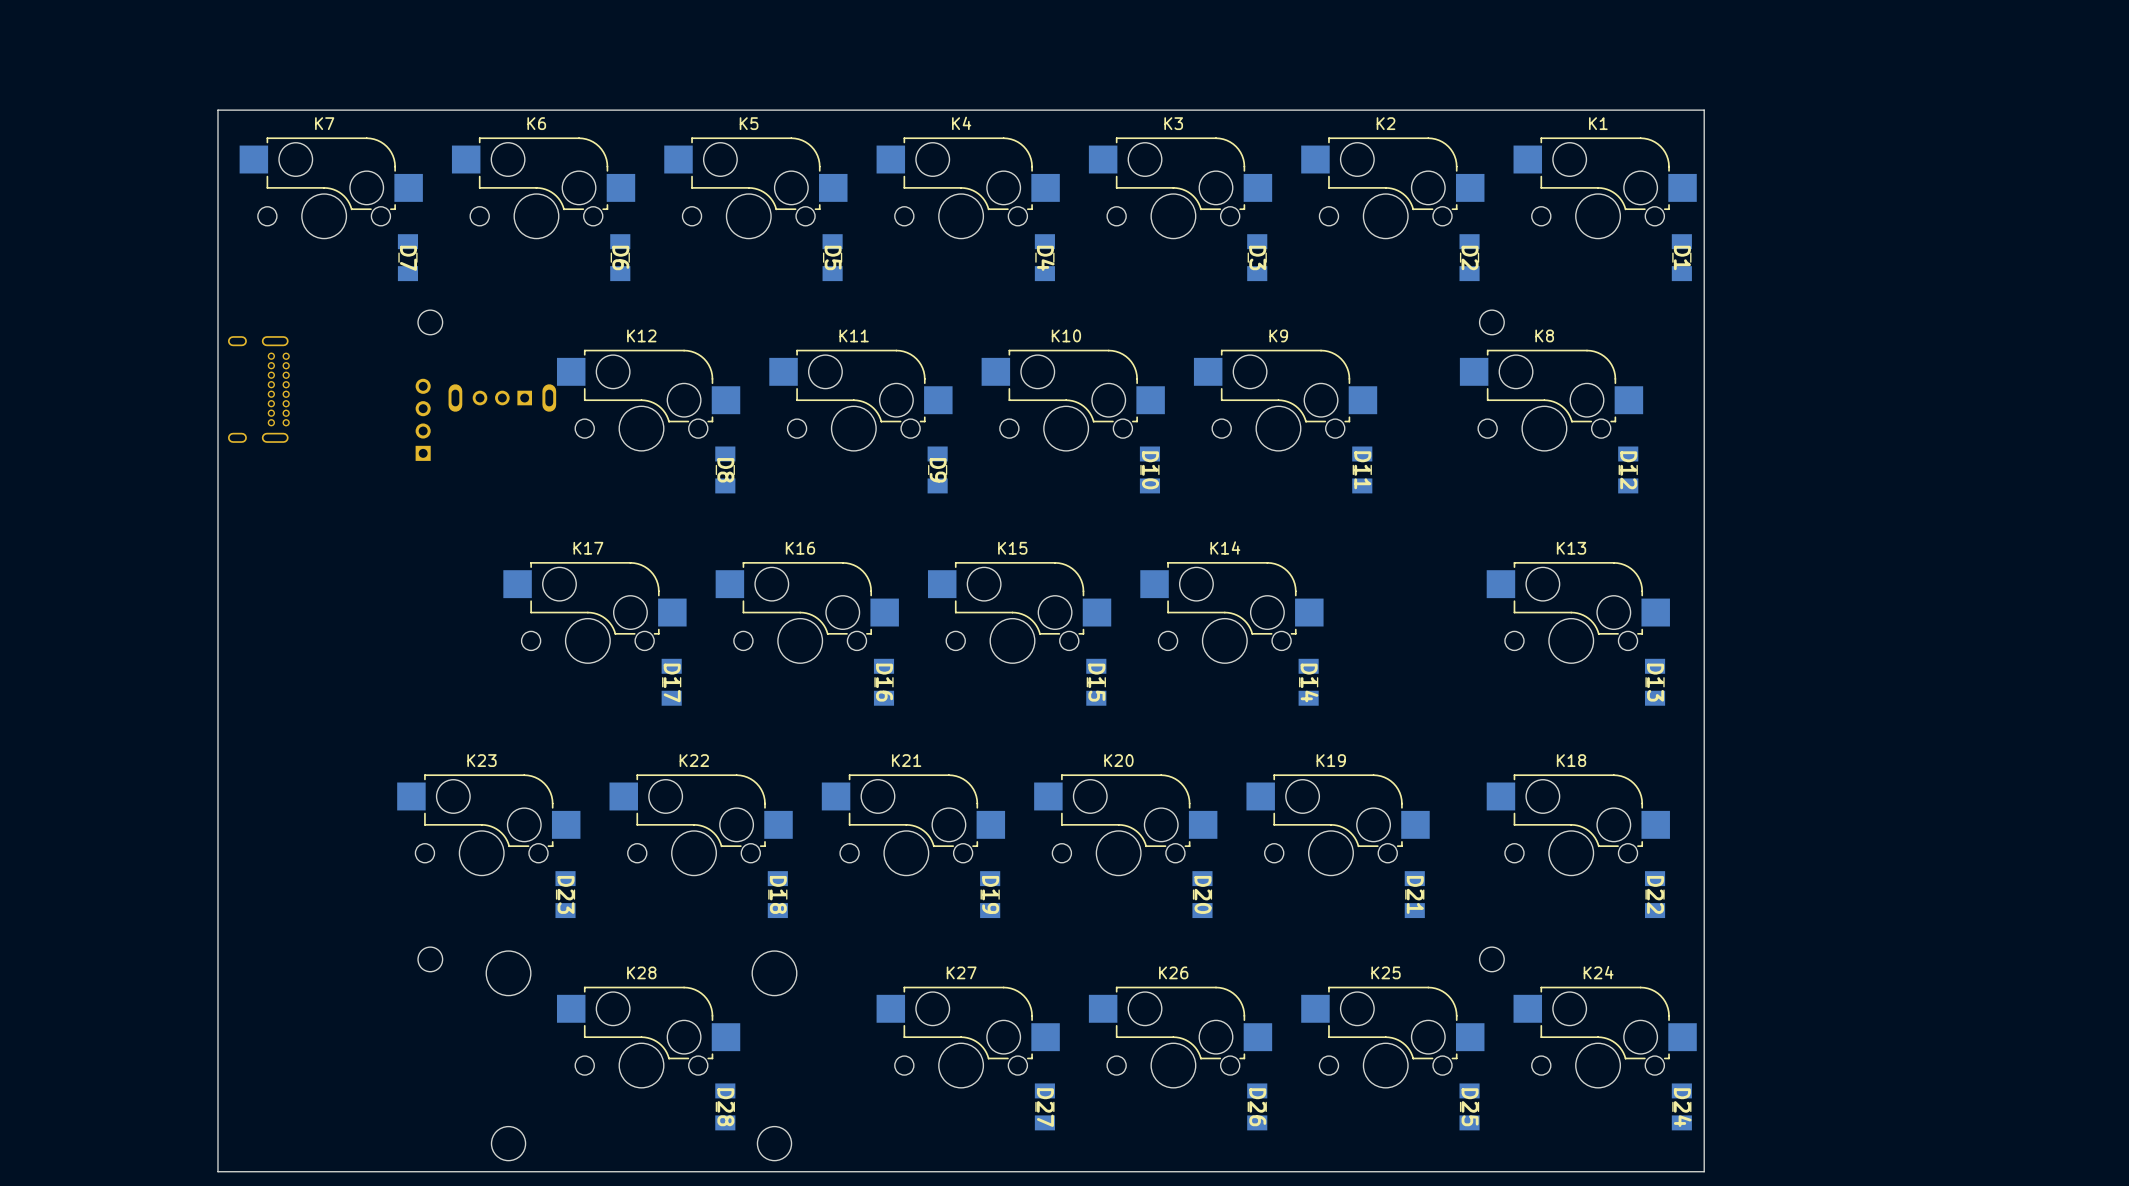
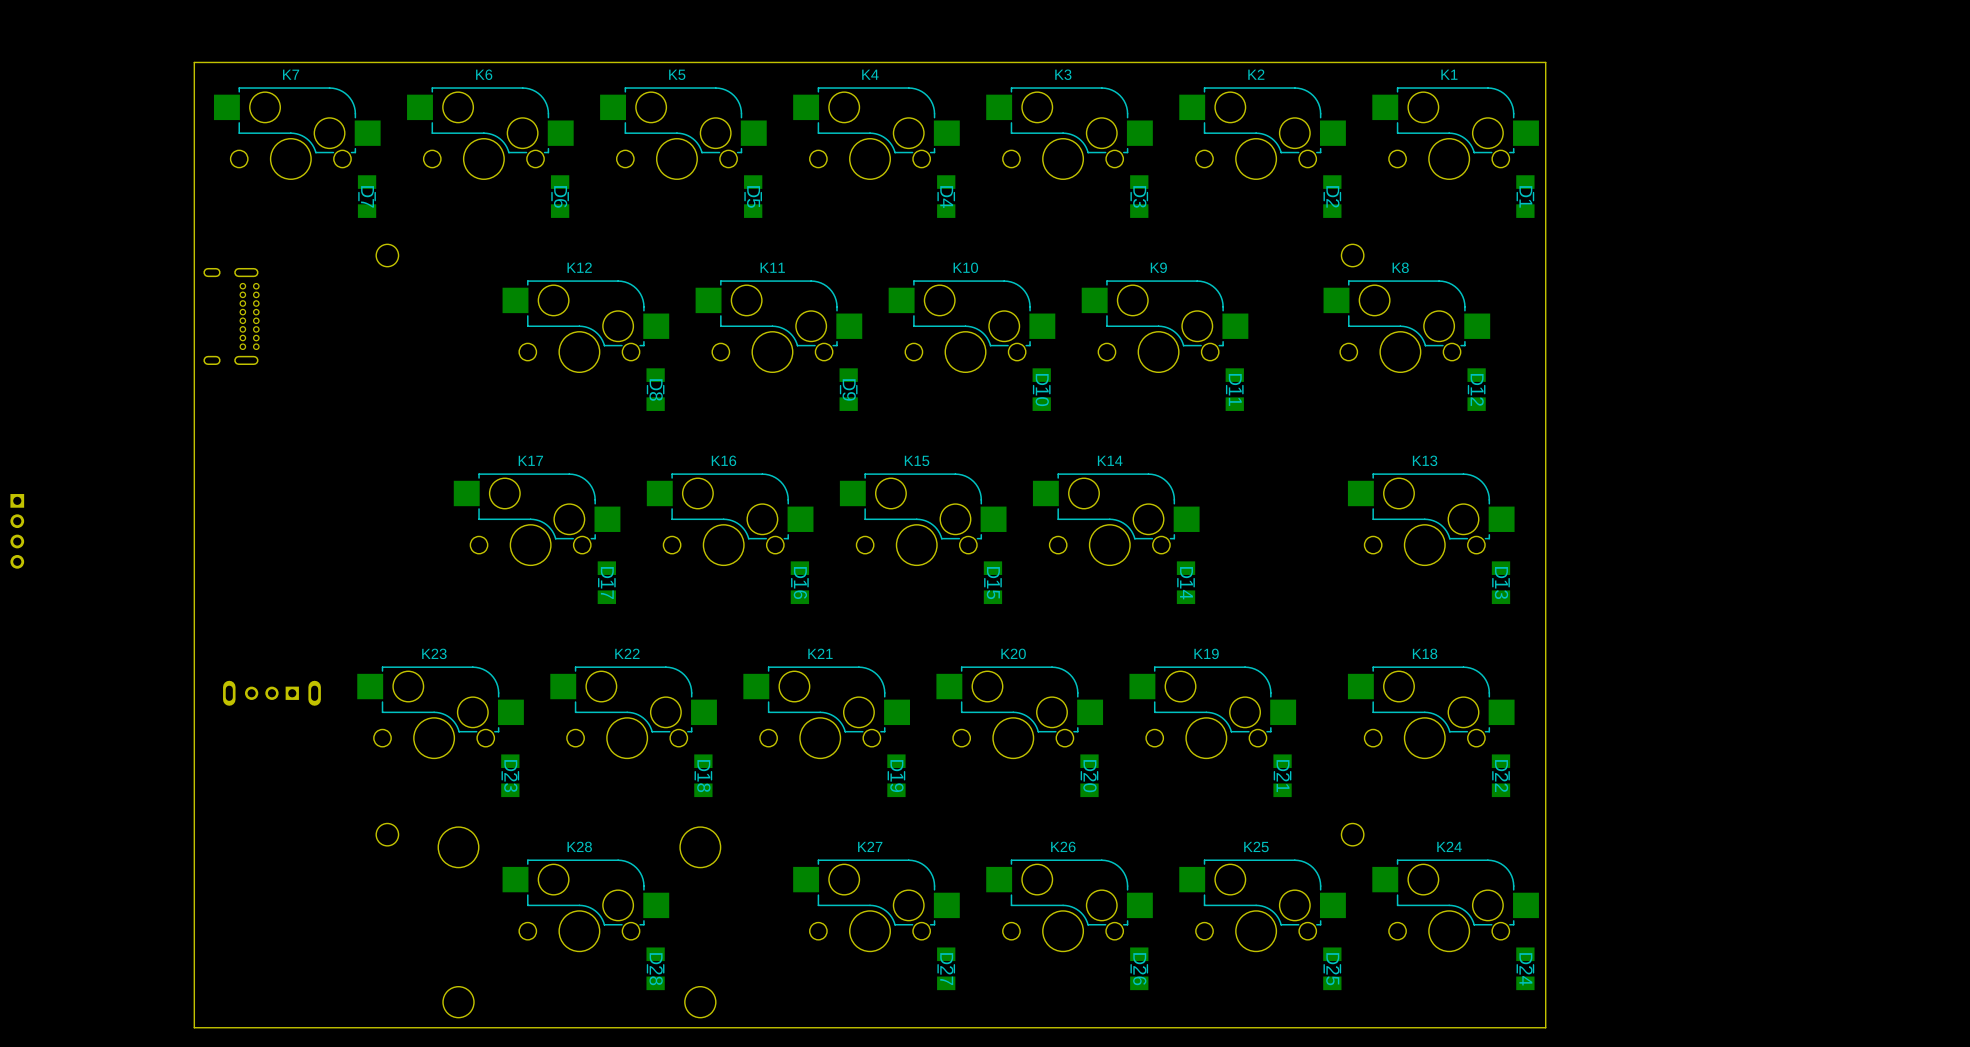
part: (502, 398) -> none
part: (423, 419) -> none
part: none -> (17, 531)
part: none -> (271, 693)

